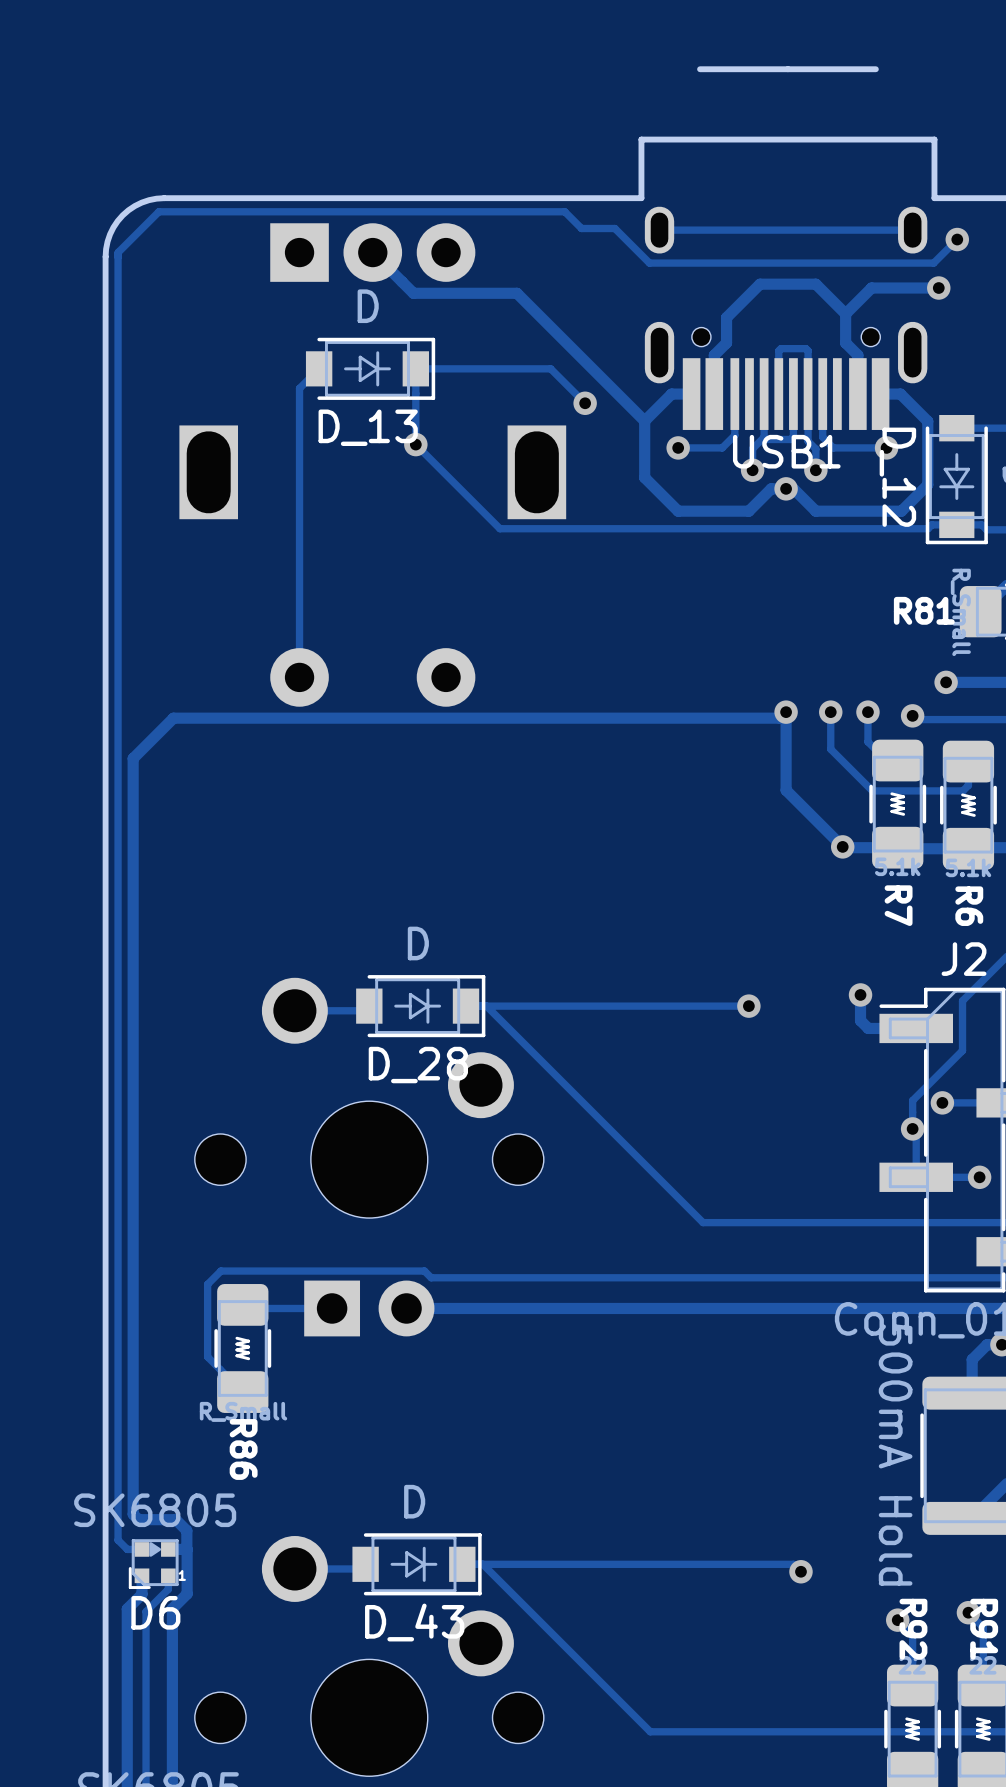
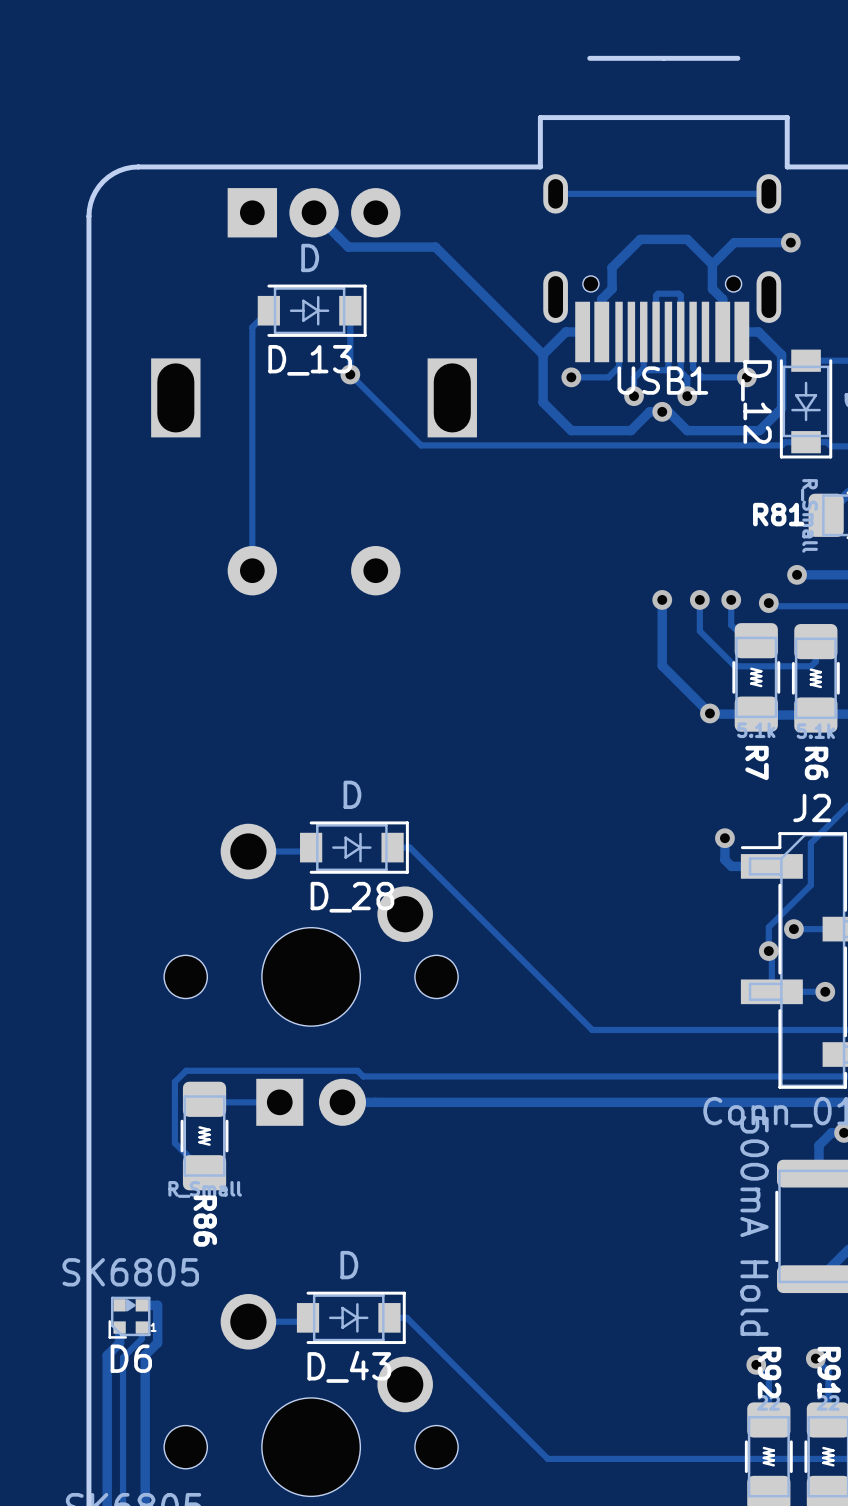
track: (957, 239) (933, 263) (649, 263) (614, 228) (581, 228) (564, 211) (158, 211) (118, 252) -> none
via: (957, 239) -> none
track: (118, 252) (118, 1540) (127, 1549) (141, 1549) -> none
track: (415, 368) (550, 368) (585, 403) -> none
via: (585, 403) -> none
track: (786, 712) (780, 718) (173, 718) (133, 758) (133, 1514) (138, 1519) (175, 1519) (186, 1530) (186, 1549) -> none
track: (748, 1006) (486, 1006) -> none
via: (748, 1006) -> none
track: (482, 1564) (793, 1564) (800, 1571) -> none
via: (800, 1571) -> none

